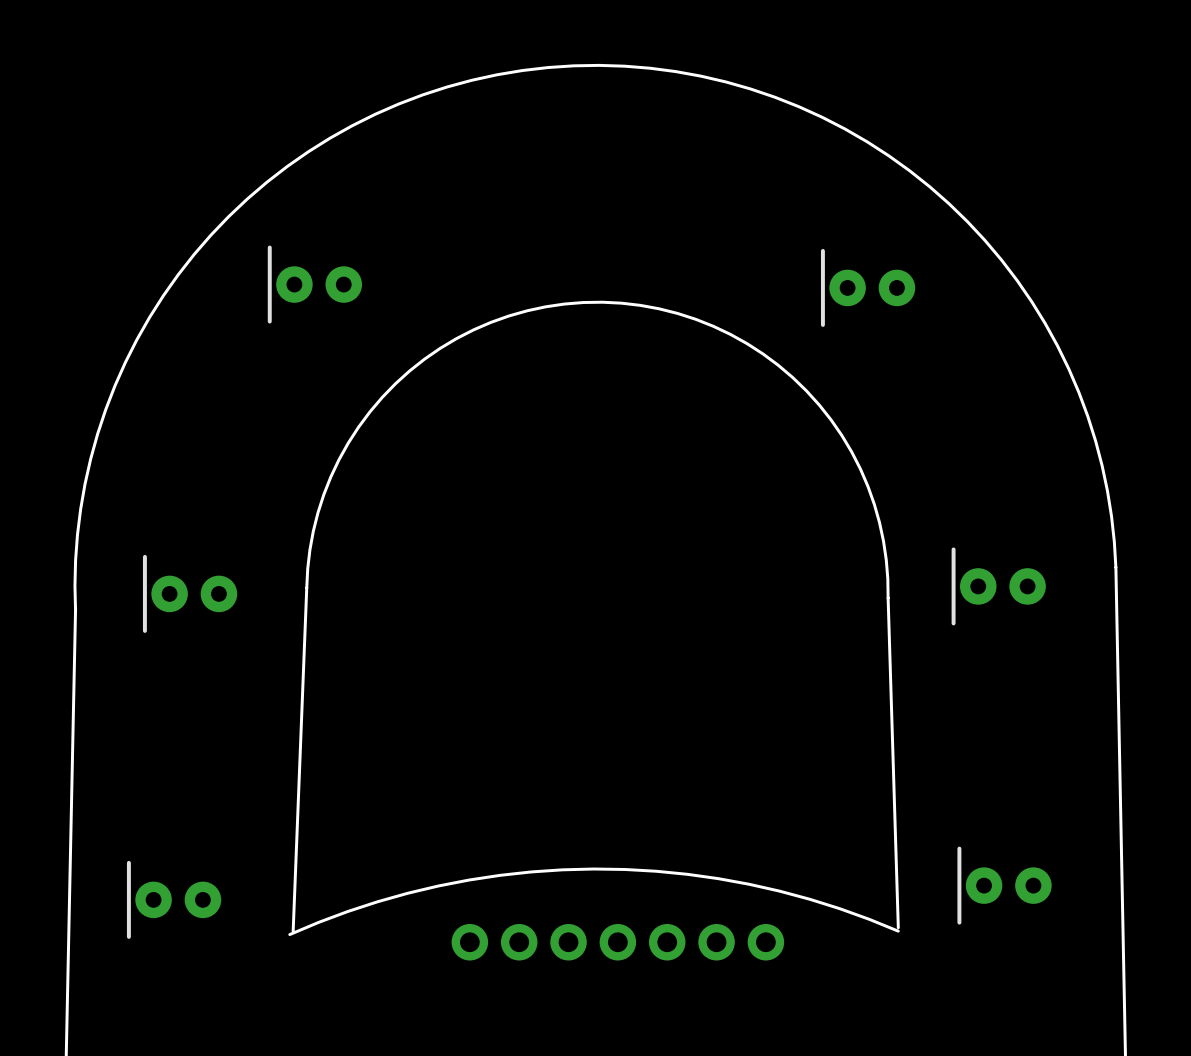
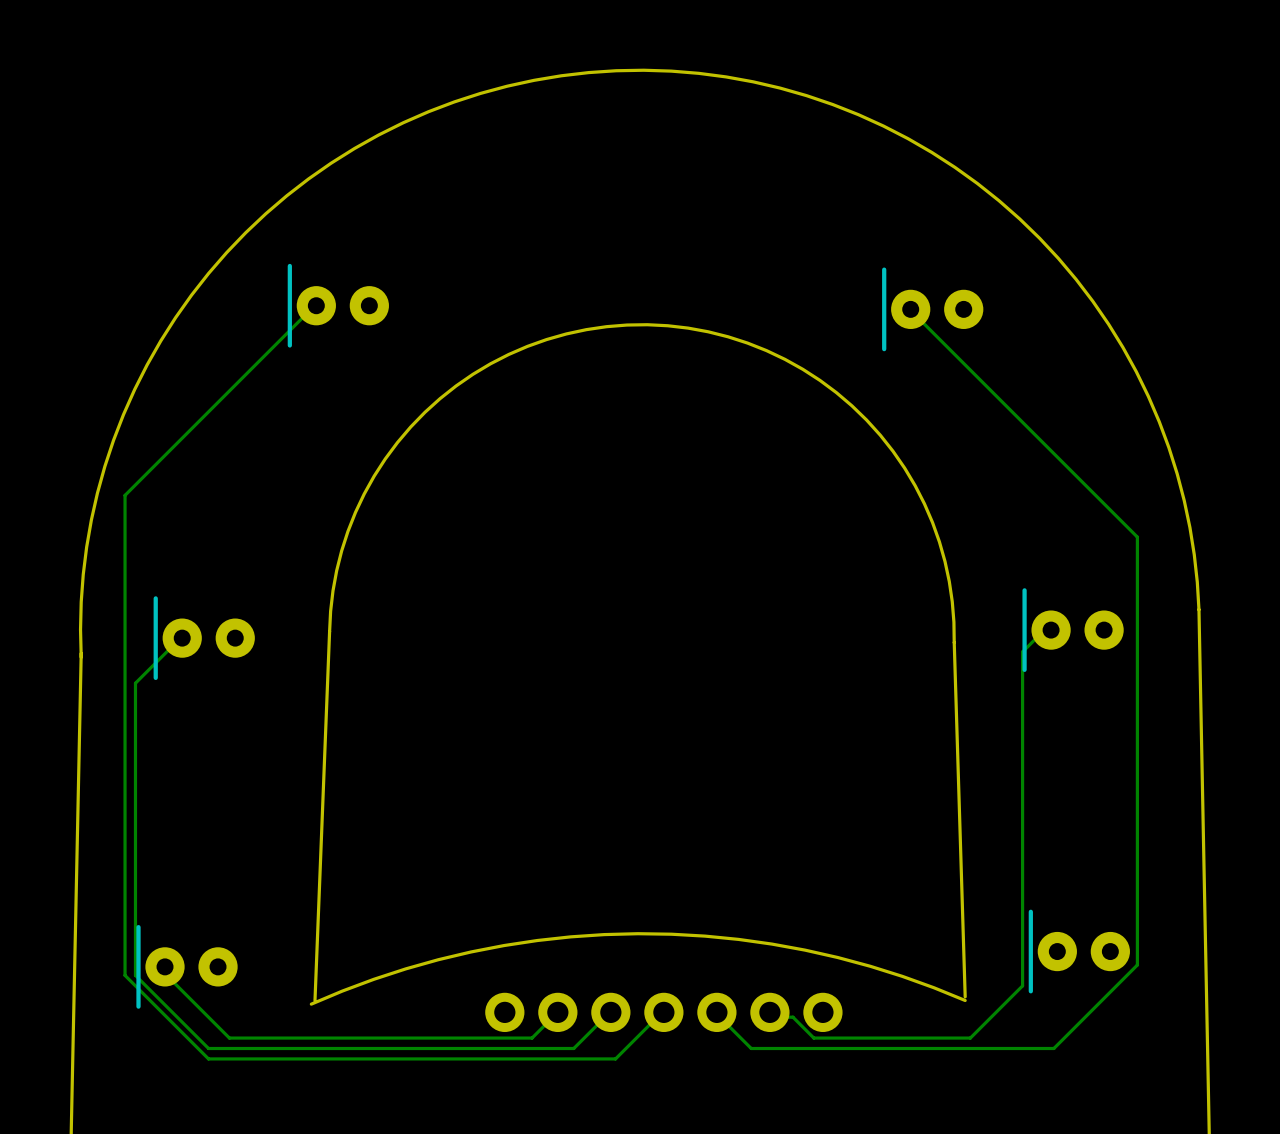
track: none -> (316, 305) (125, 495) (125, 975) (208, 1058) (615, 1058) (663, 1012)
track: none -> (910, 309) (1137, 537) (1137, 965) (1053, 1048) (751, 1048) (716, 1012)
track: none -> (1051, 630) (1043, 631) (1022, 651) (1022, 985) (970, 1038) (813, 1038) (792, 1017) (772, 1017) (769, 1012)
track: none -> (182, 638) (135, 683) (135, 975) (208, 1048) (573, 1048) (610, 1012)
track: none -> (165, 966) (166, 975) (229, 1038) (532, 1038) (557, 1012)

